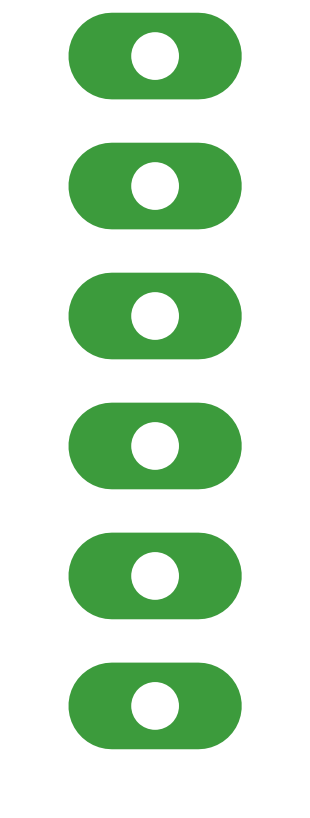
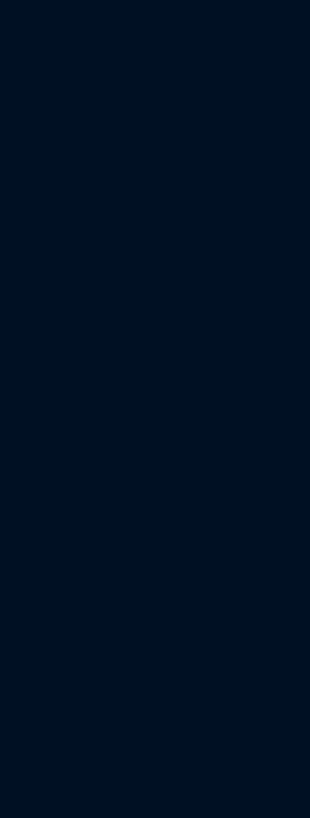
part: (155, 56) -> none
part: (155, 186) -> none
part: (155, 316) -> none
part: (155, 445) -> none
part: (155, 575) -> none
part: (155, 705) -> none

